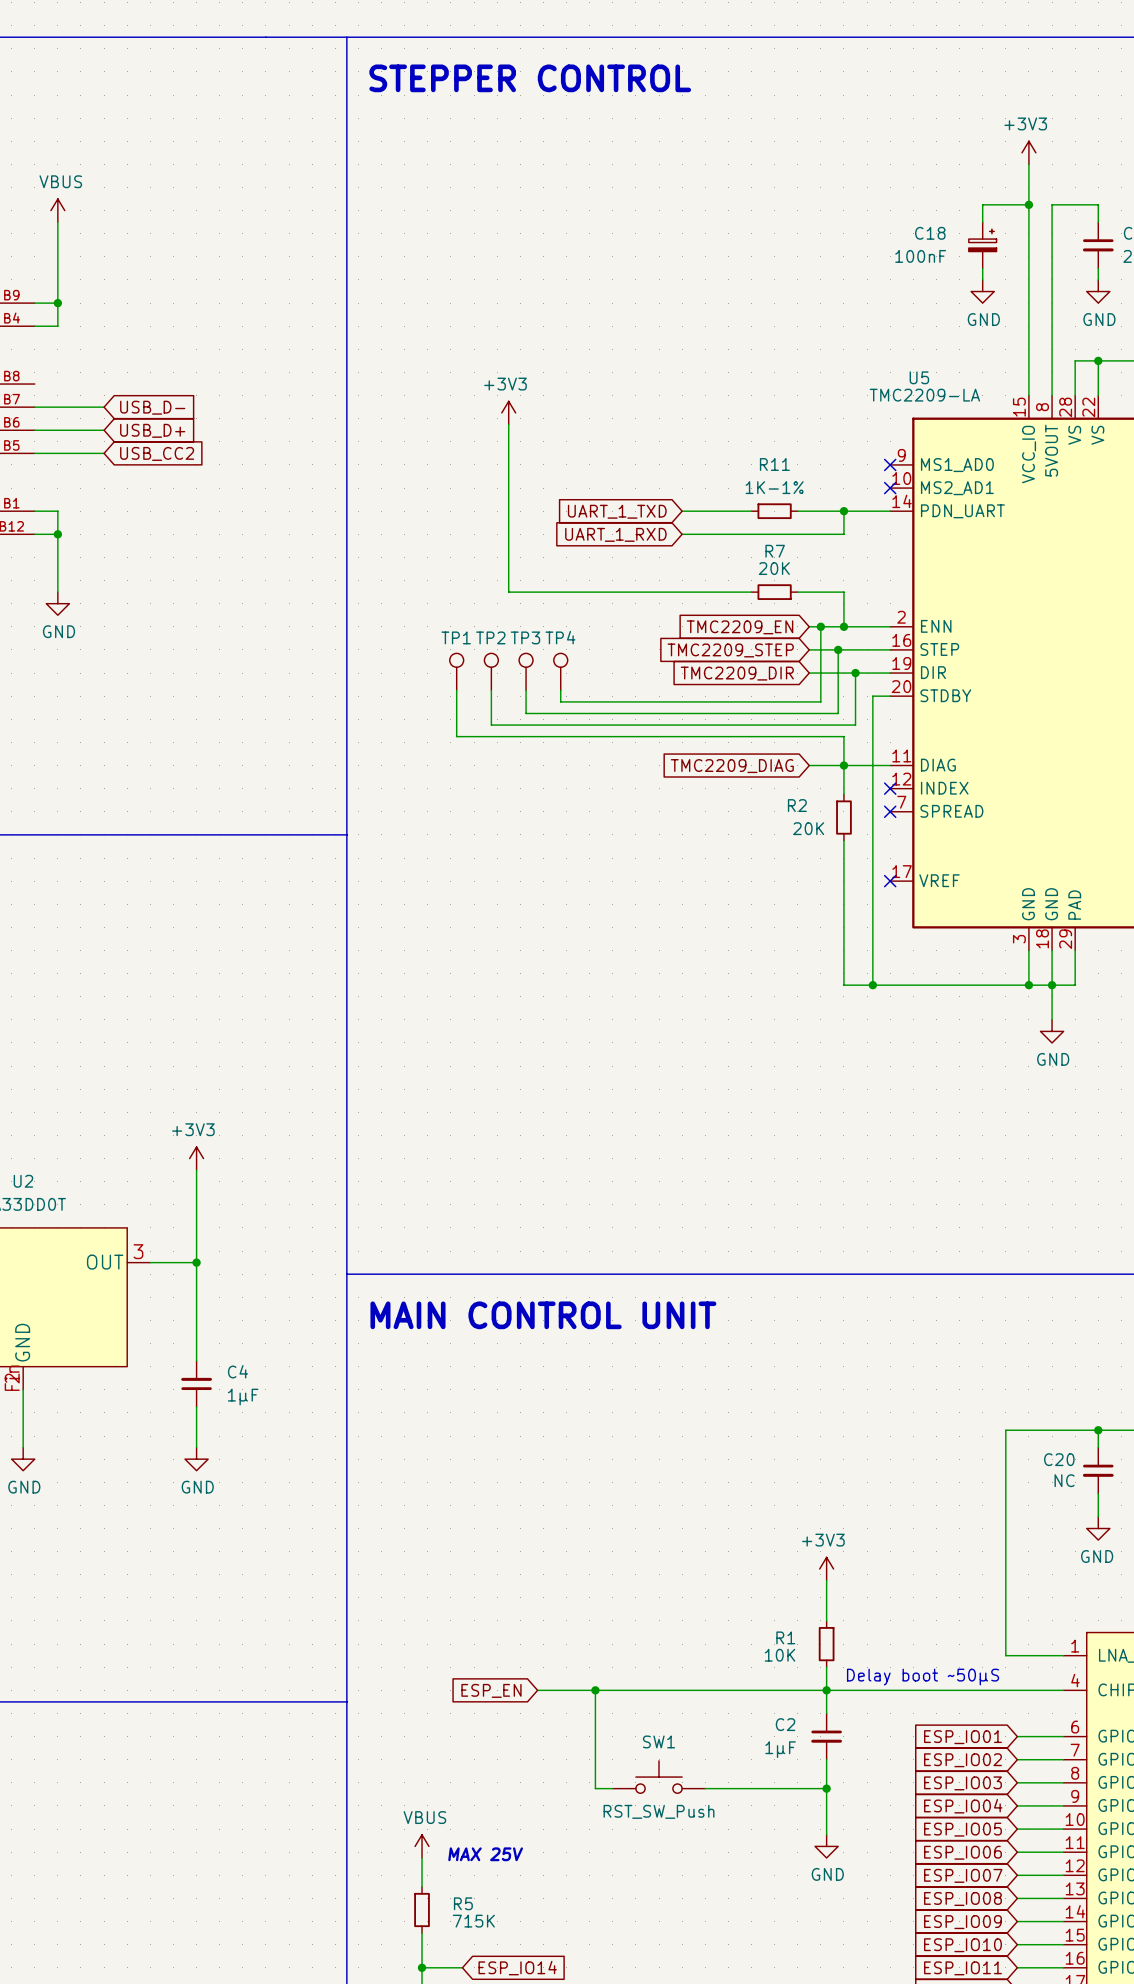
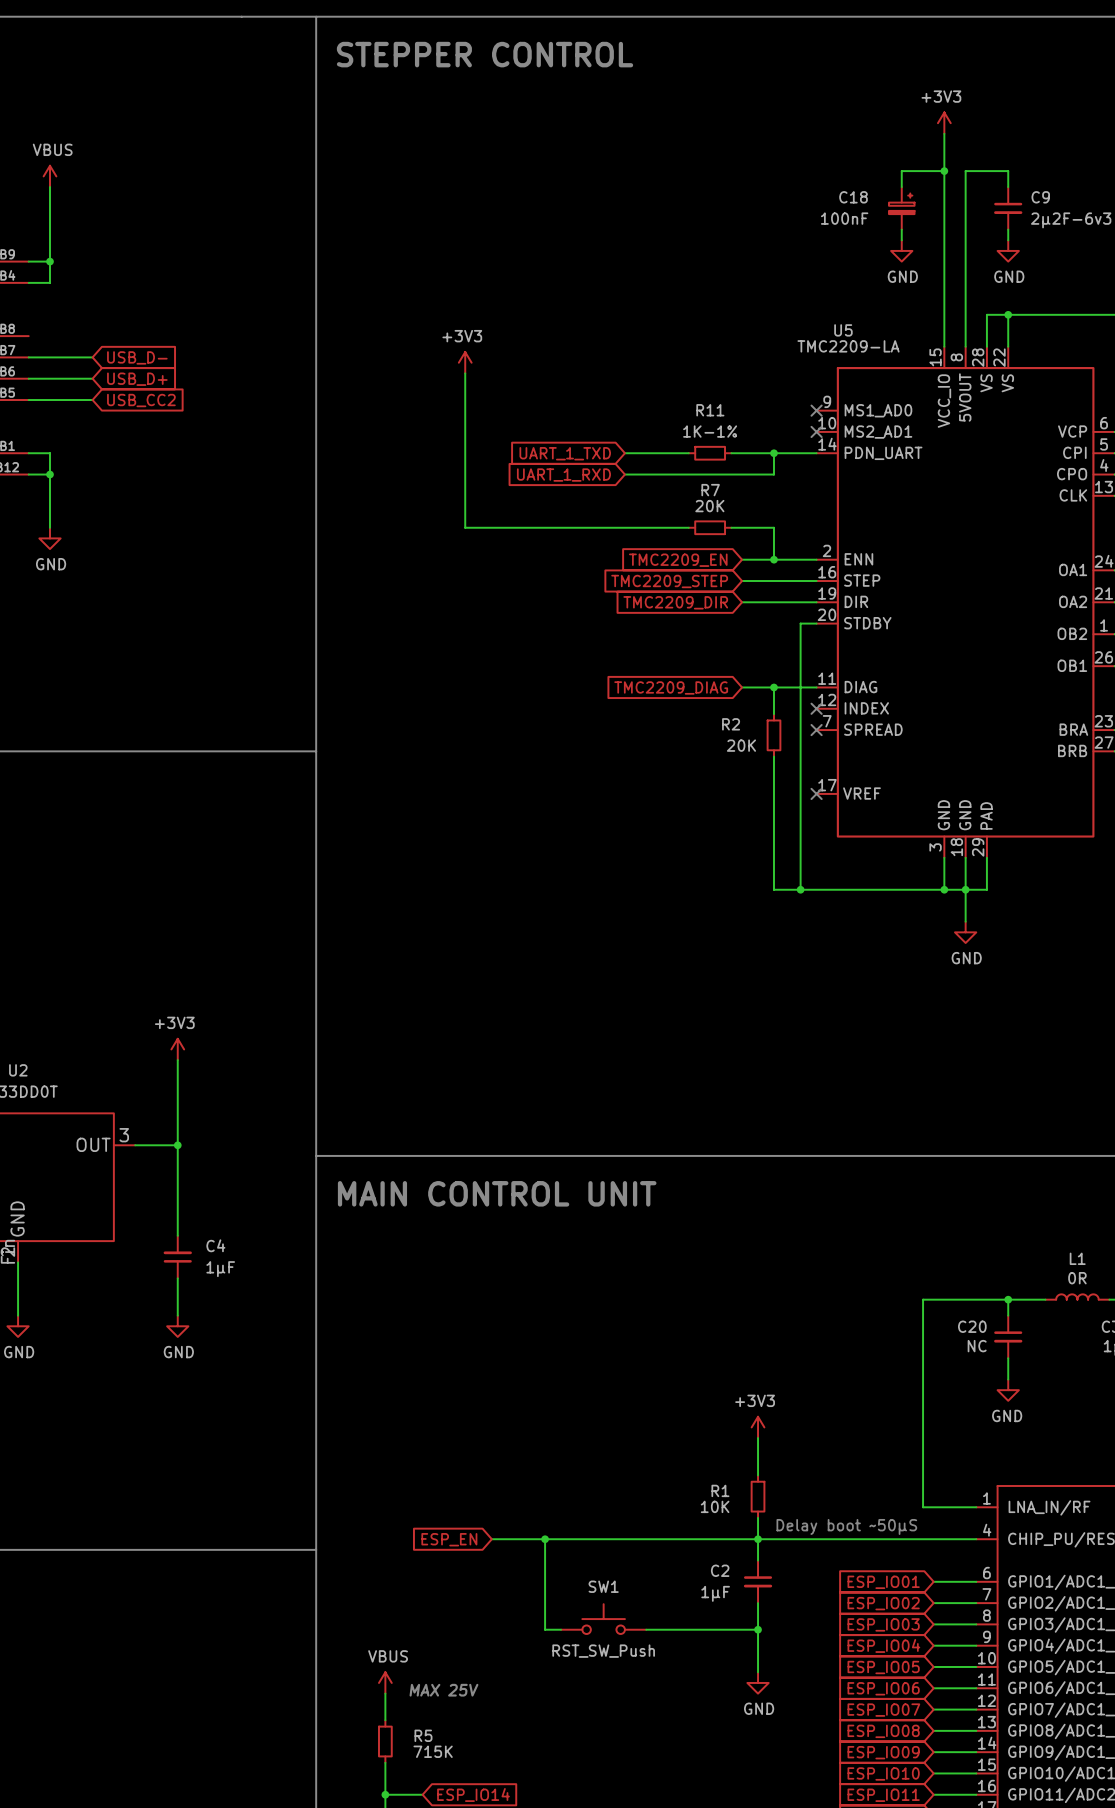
wire: (820, 626) (820, 701) (560, 701) (560, 690) -> none
junction: (820, 626) -> none
wire: (838, 649) (838, 713) (526, 713) (526, 690) -> none
junction: (838, 649) -> none
TP1: (456, 671) -> none
TP2: (491, 671) -> none
TP3: (526, 671) -> none
TP4: (560, 671) -> none
wire: (855, 673) (855, 725) (491, 725) (491, 690) -> none
junction: (855, 673) -> none
wire: (456, 690) (456, 736) (843, 736) (843, 765) -> none

